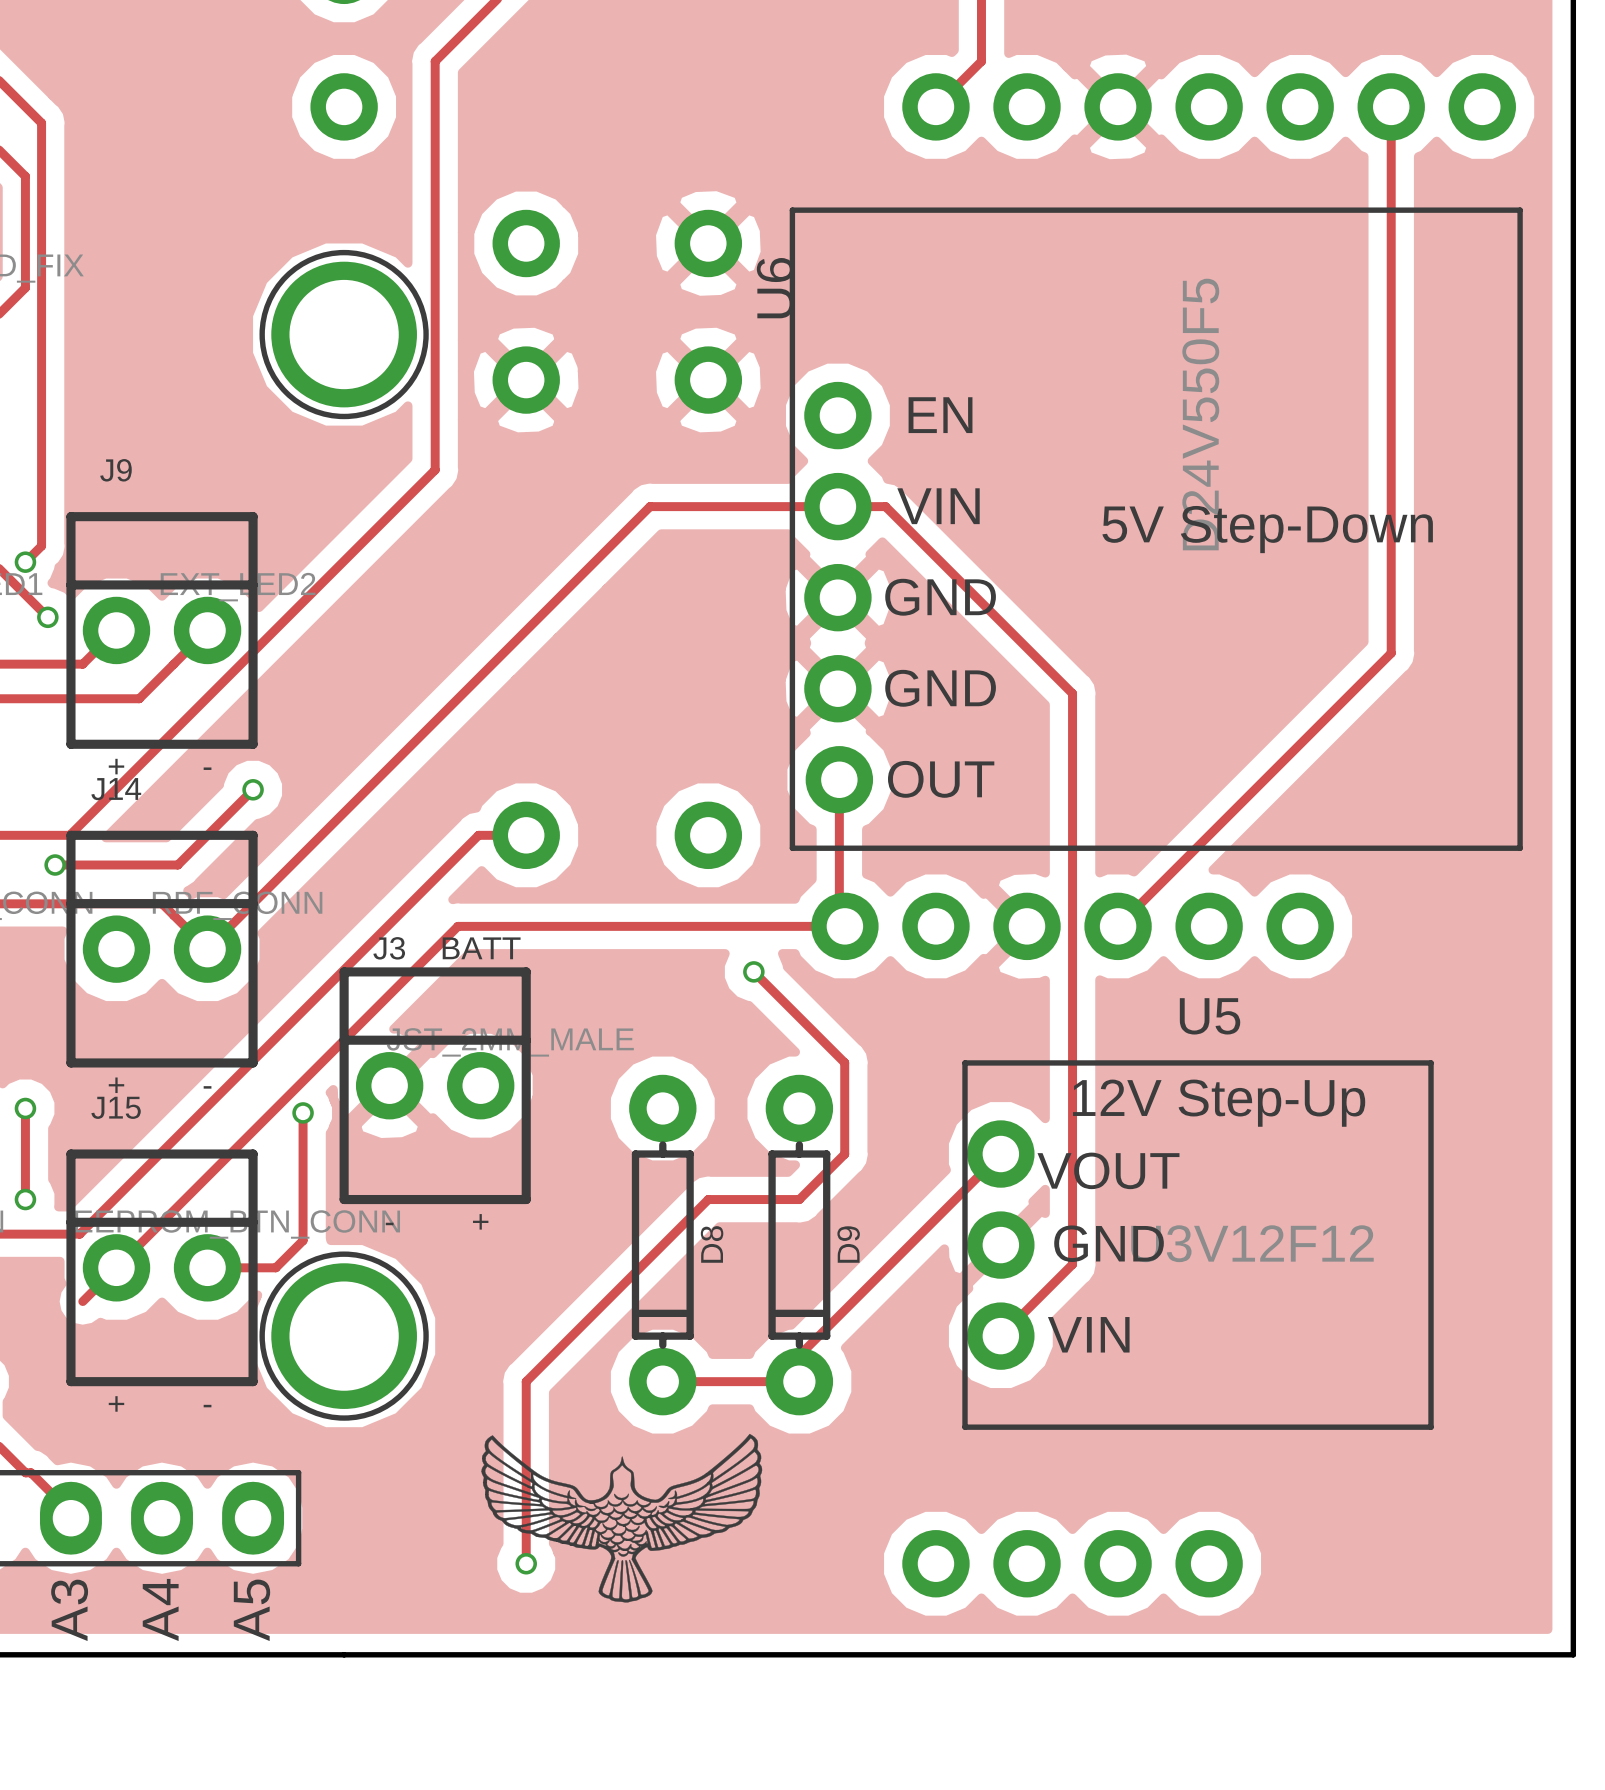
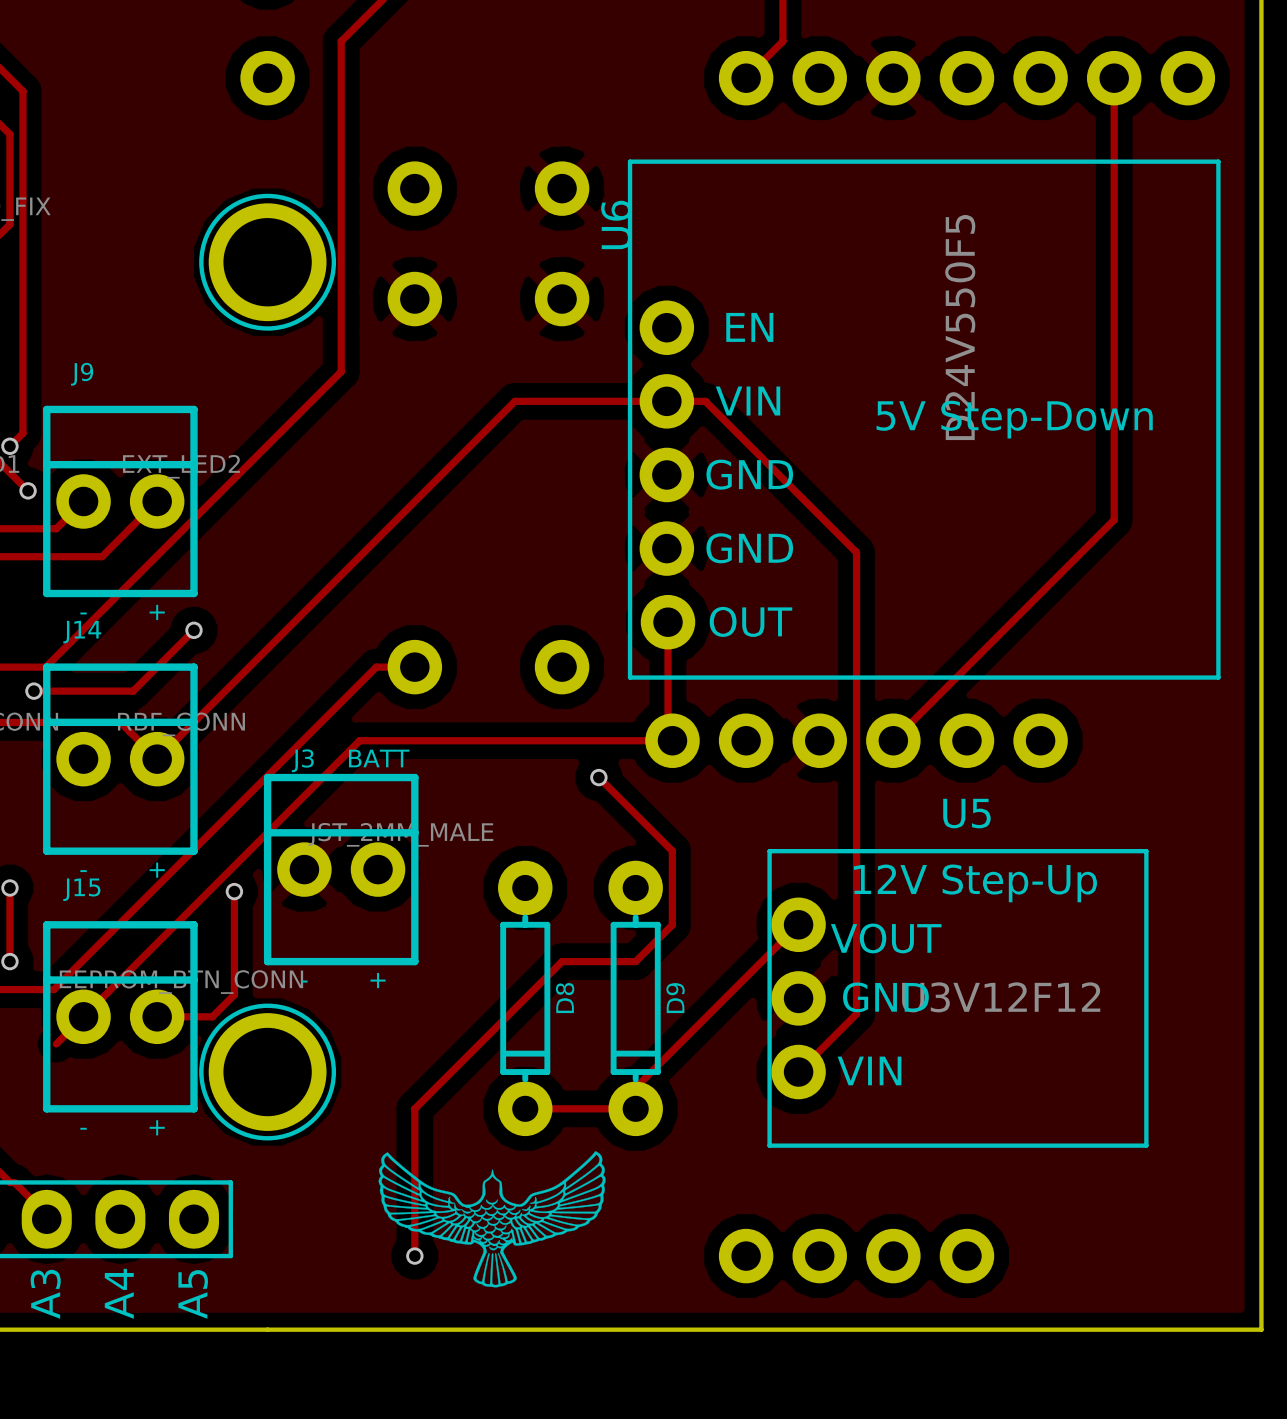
J9 text: + (116, 766) -> - (83, 613)
J9 text: - (207, 768) -> + (157, 612)
J14 text: + (116, 1085) -> - (83, 871)
J14 text: - (207, 1087) -> + (157, 870)
J15 text: + (116, 1403) -> - (83, 1128)
J15 text: - (207, 1406) -> + (157, 1127)

